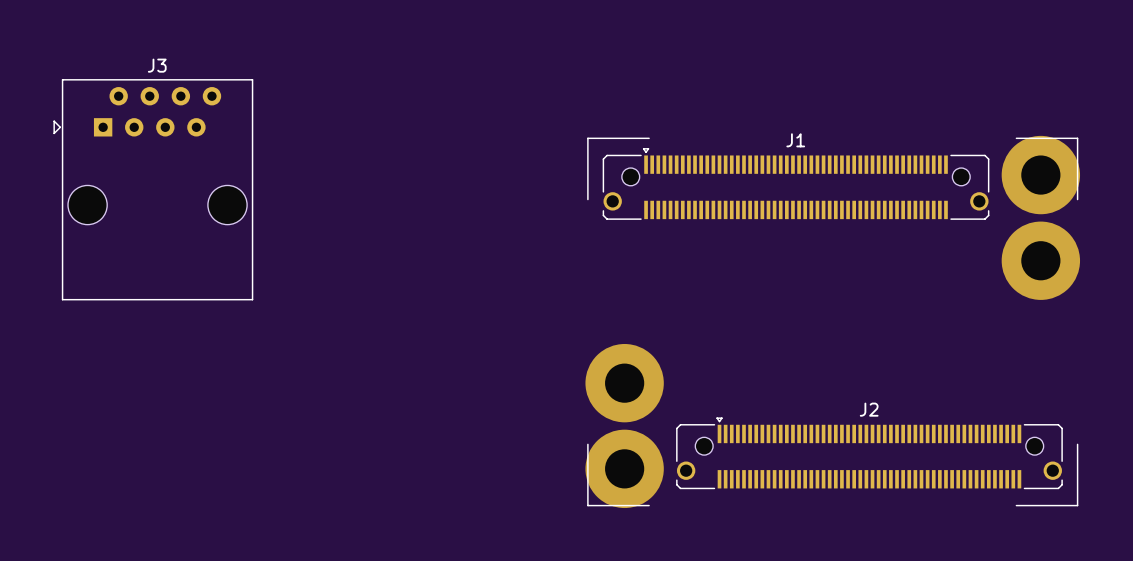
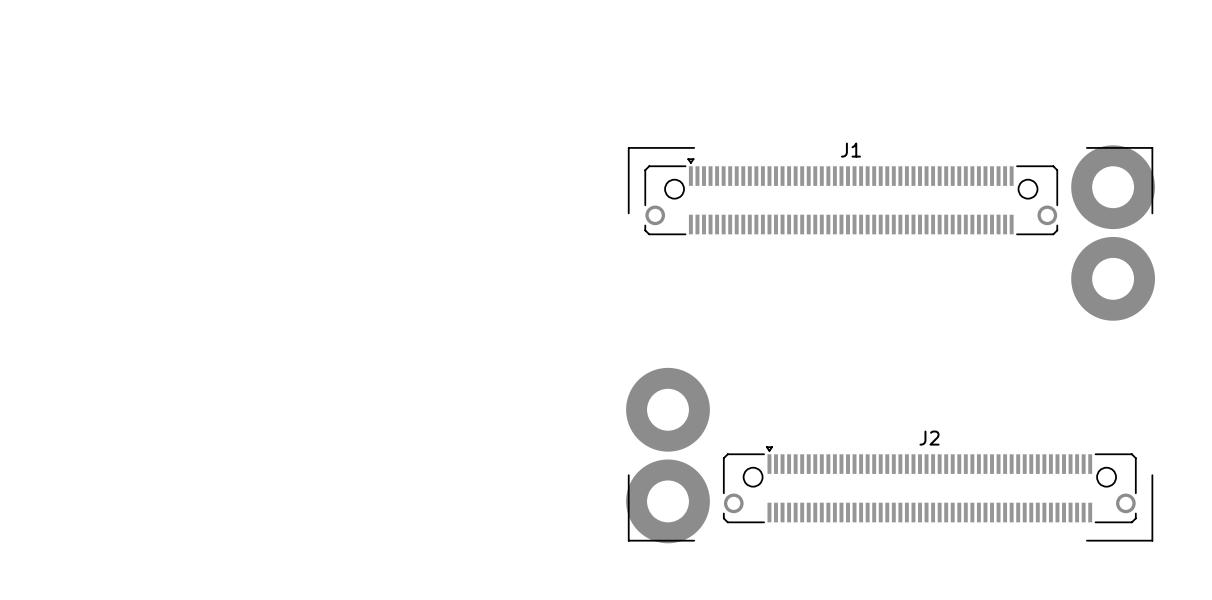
J3: (153, 189) -> none

